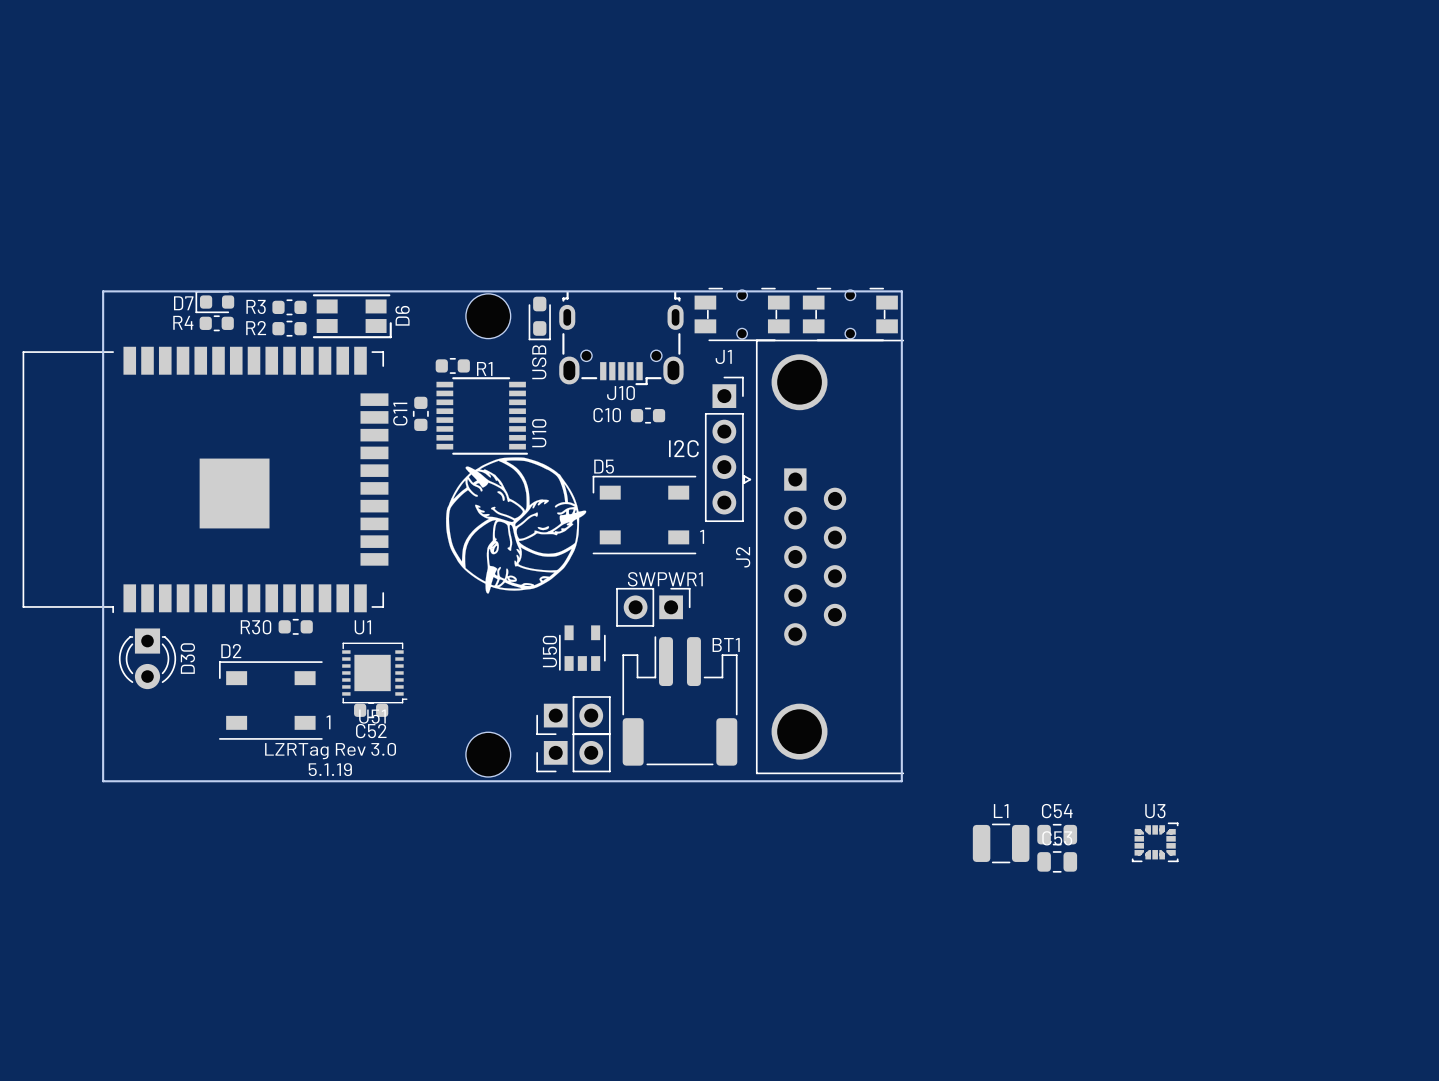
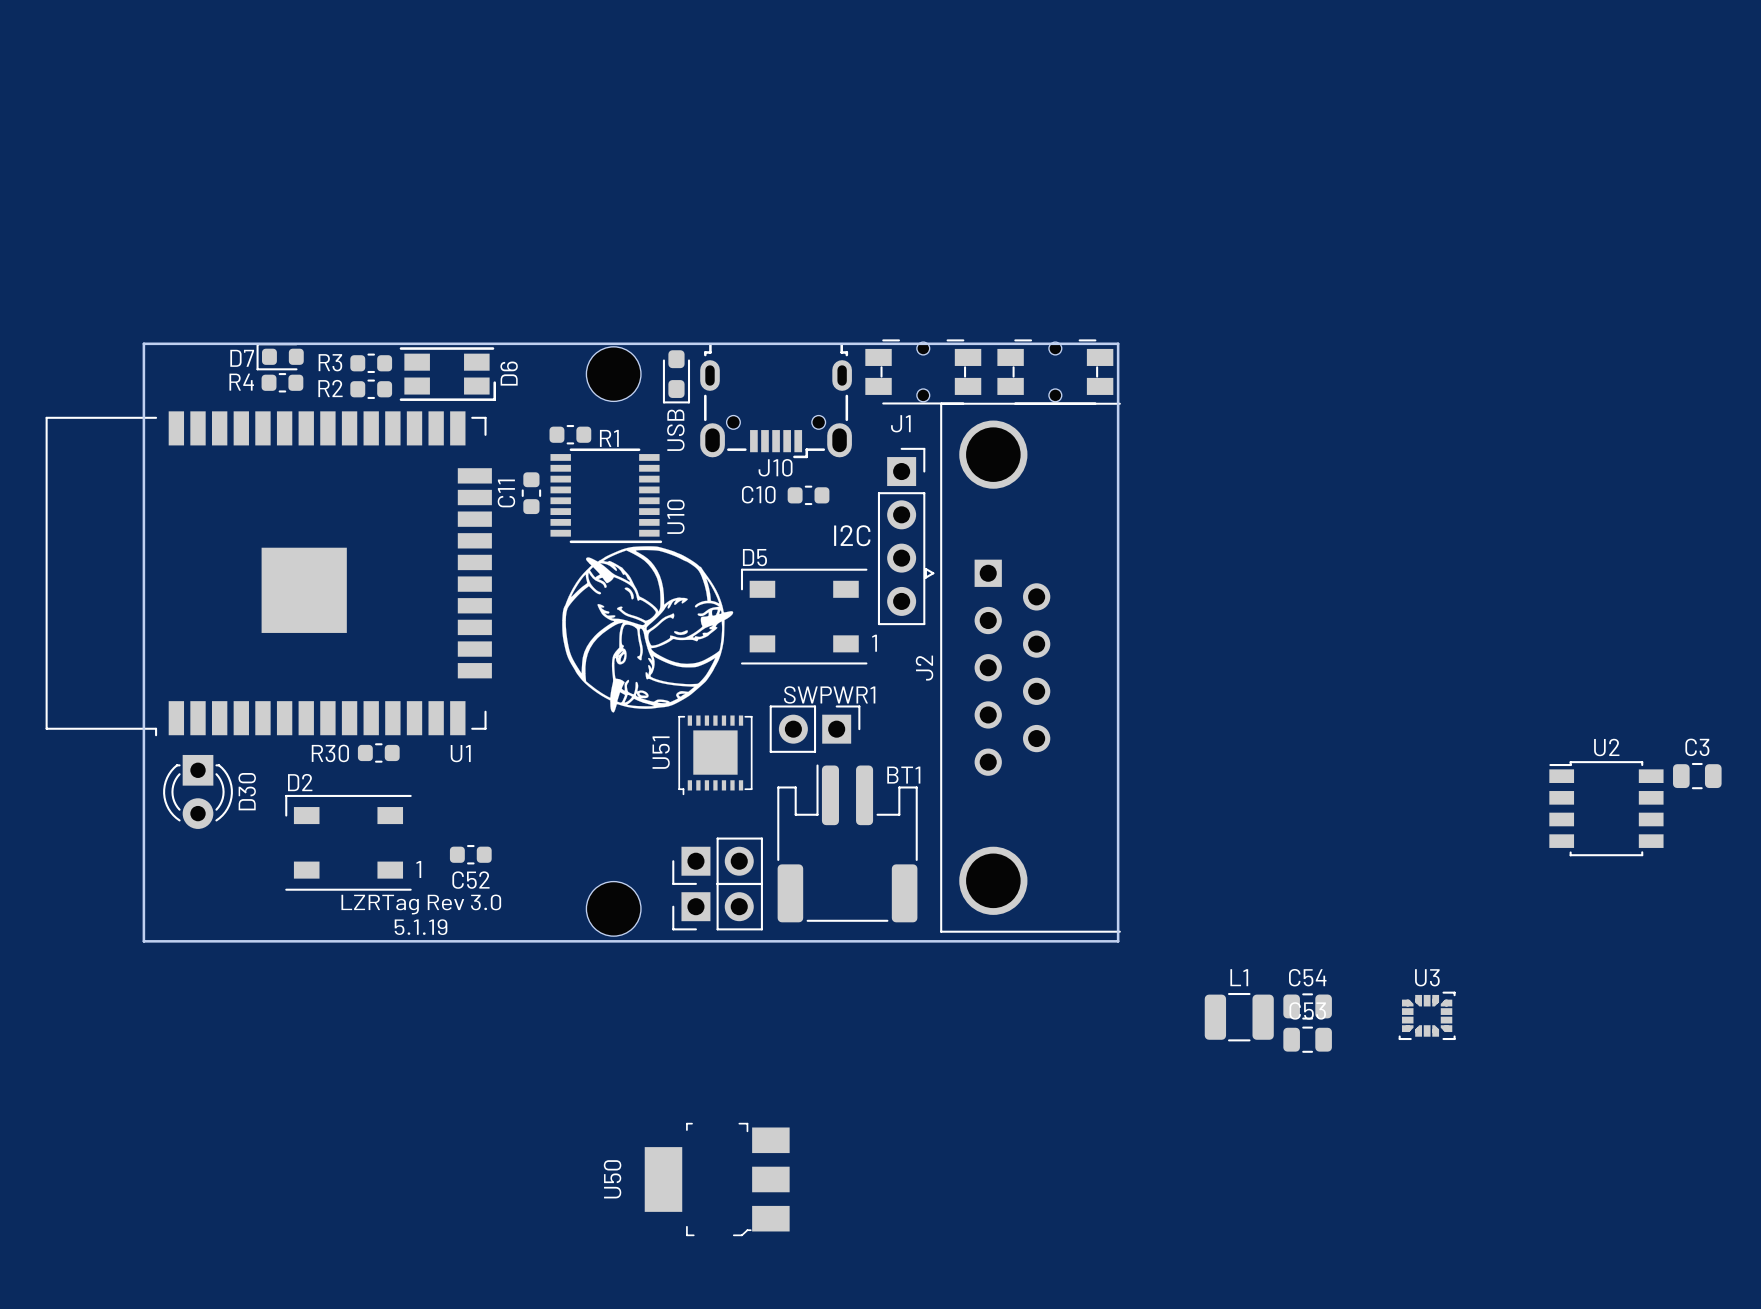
U50 footprint: [559, 625, 606, 671] -> [644, 1122, 790, 1237]
C3: none -> (1697, 776)
U50 name position: U50 (549, 651) -> U50 (612, 1179)
U51 rotation: 0° (374, 672) -> 90° clockwise (715, 755)
U51 position: (374, 672) -> (715, 755)
U2: none -> (1606, 808)

